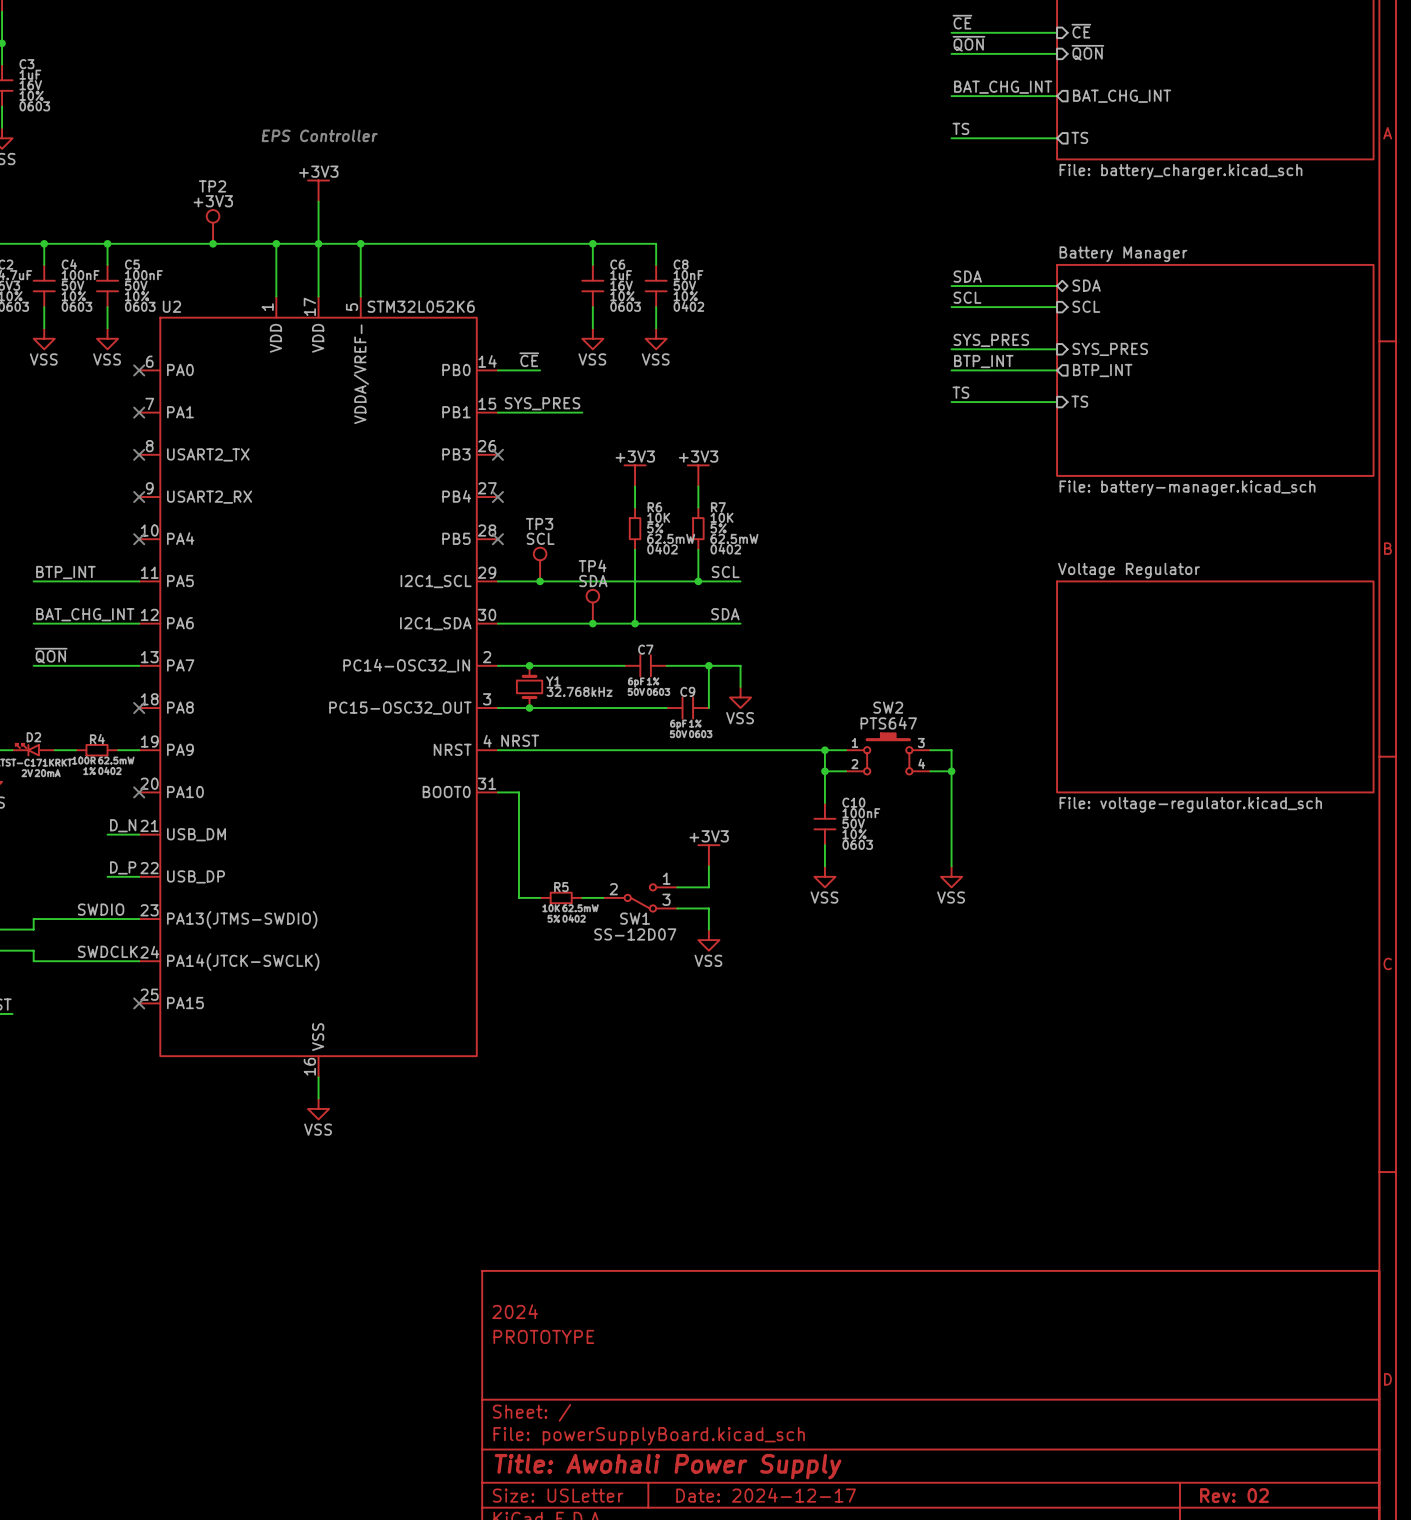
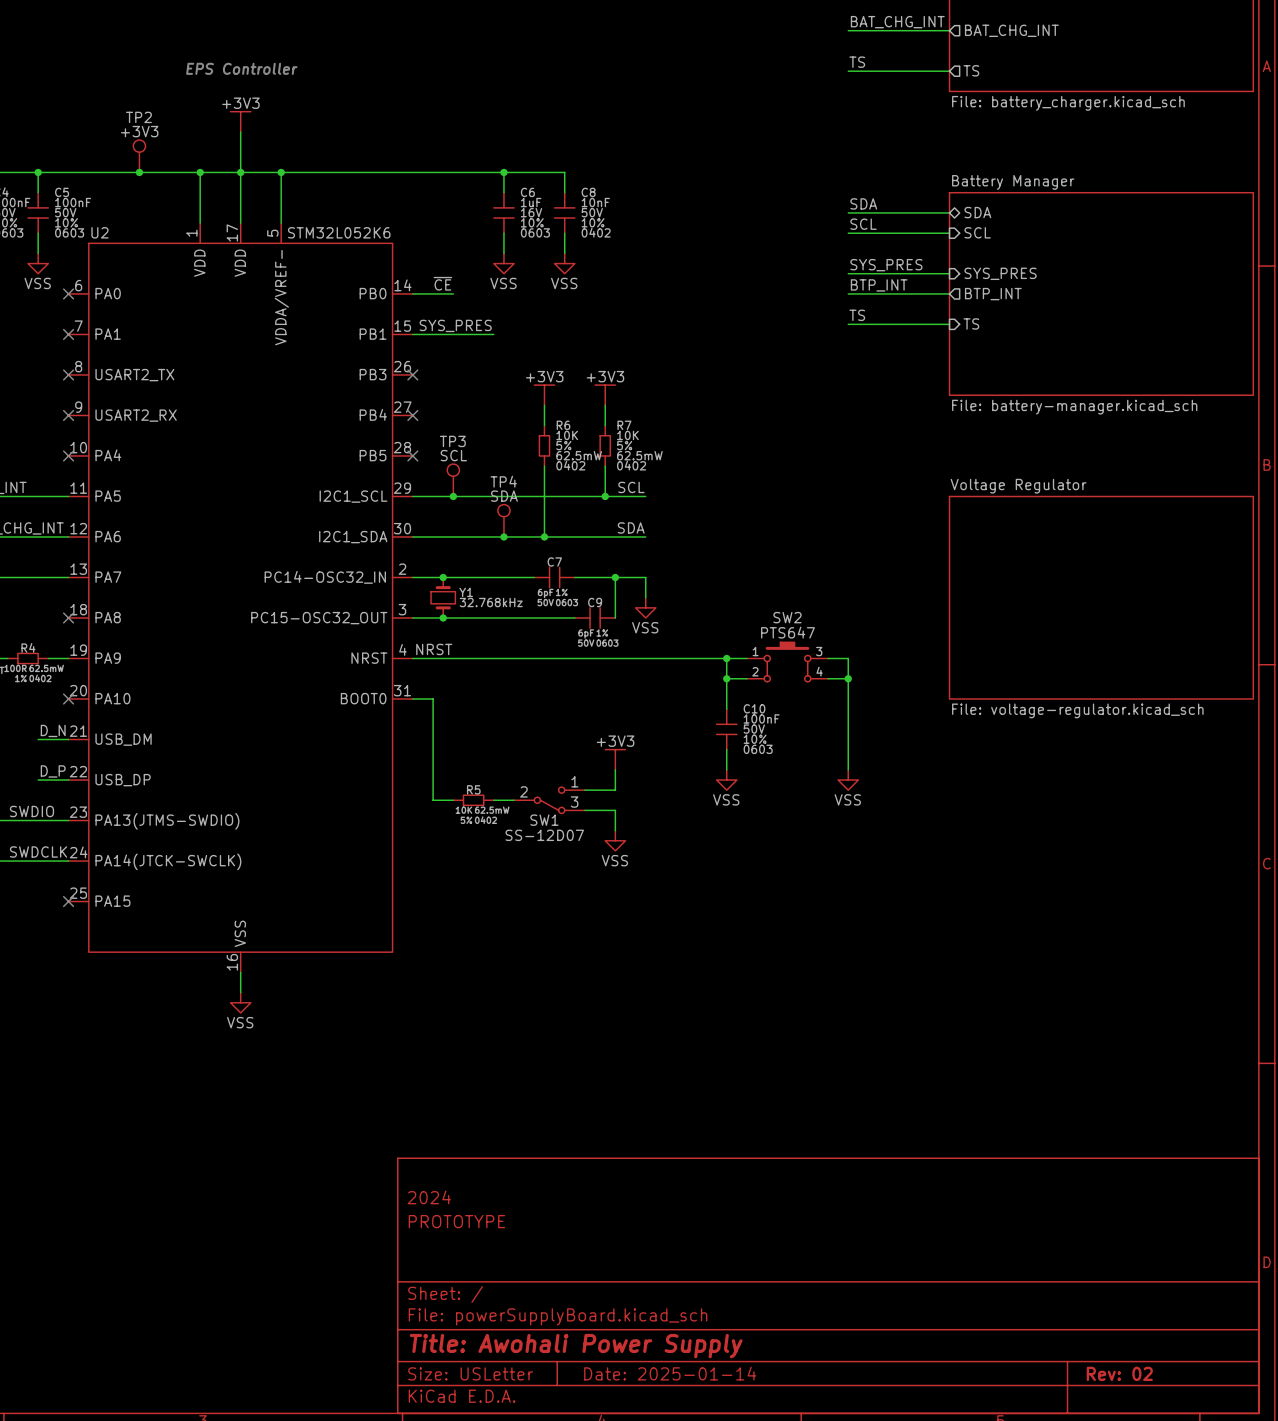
title block: Date: 2024-12-17 (766, 1495) -> Date: 2025-01-14 (670, 1373)

